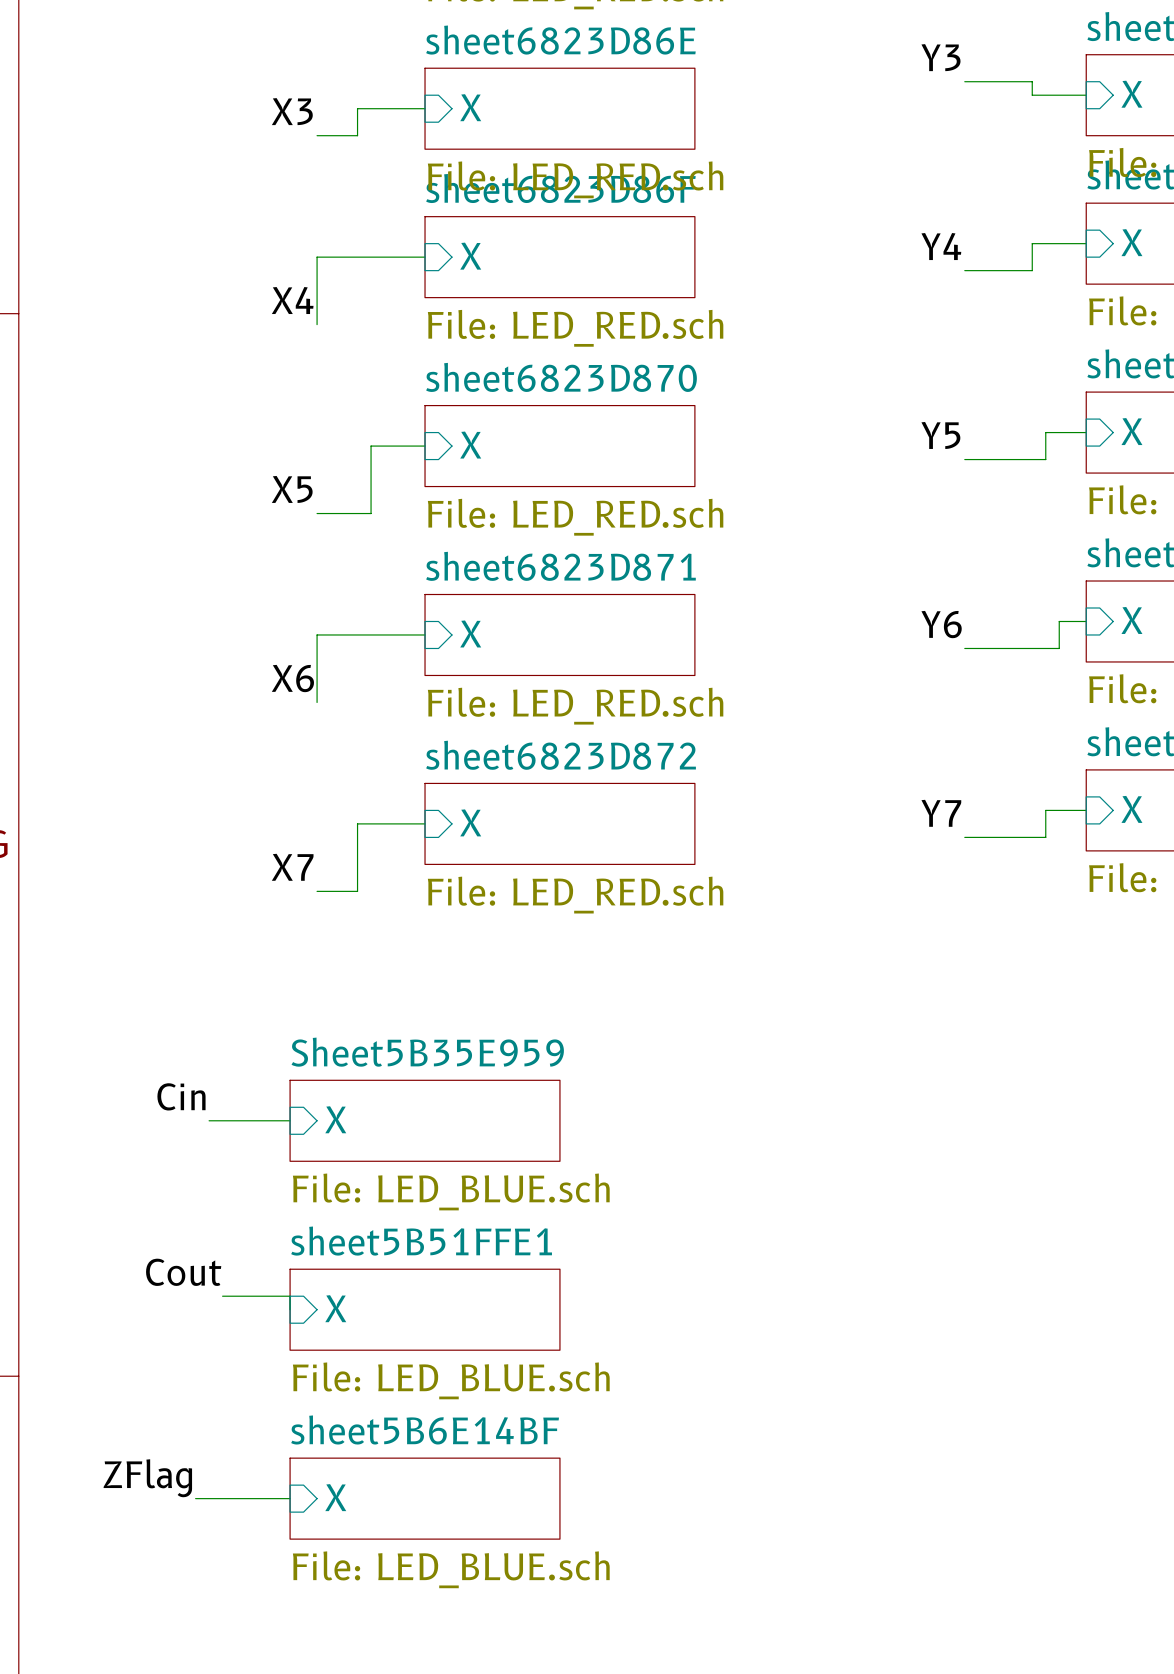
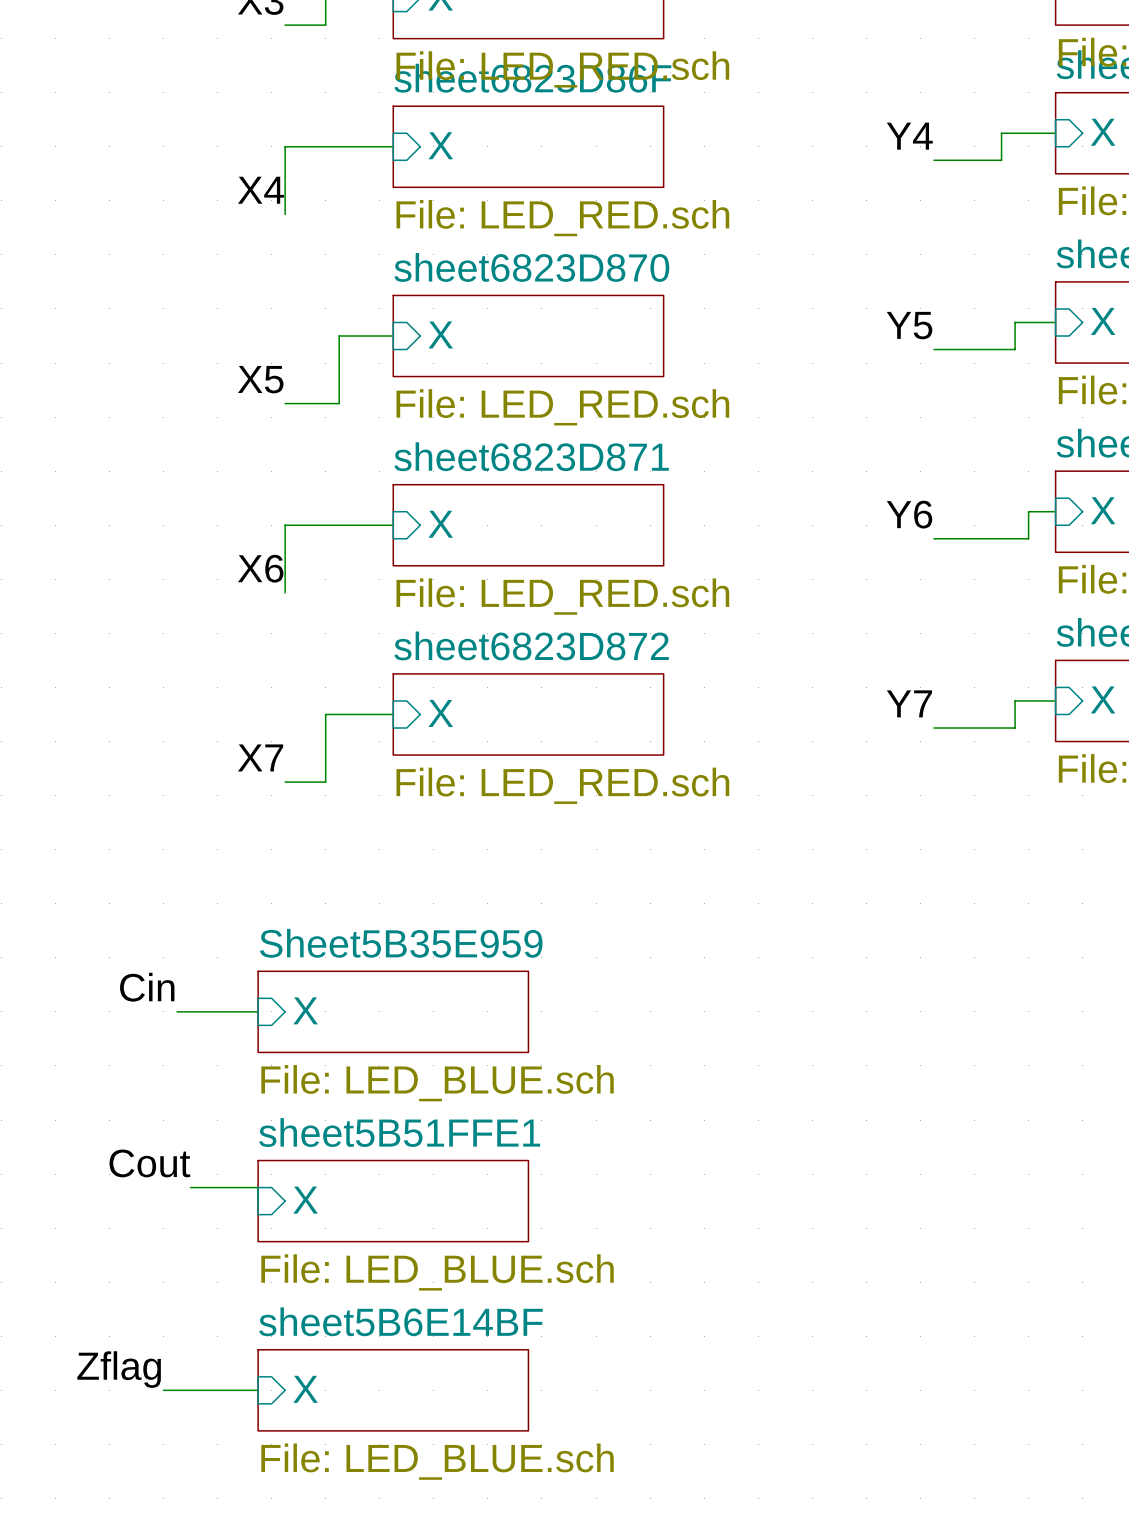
label: ZFlag (147, 1478) -> Zflag (119, 1369)

